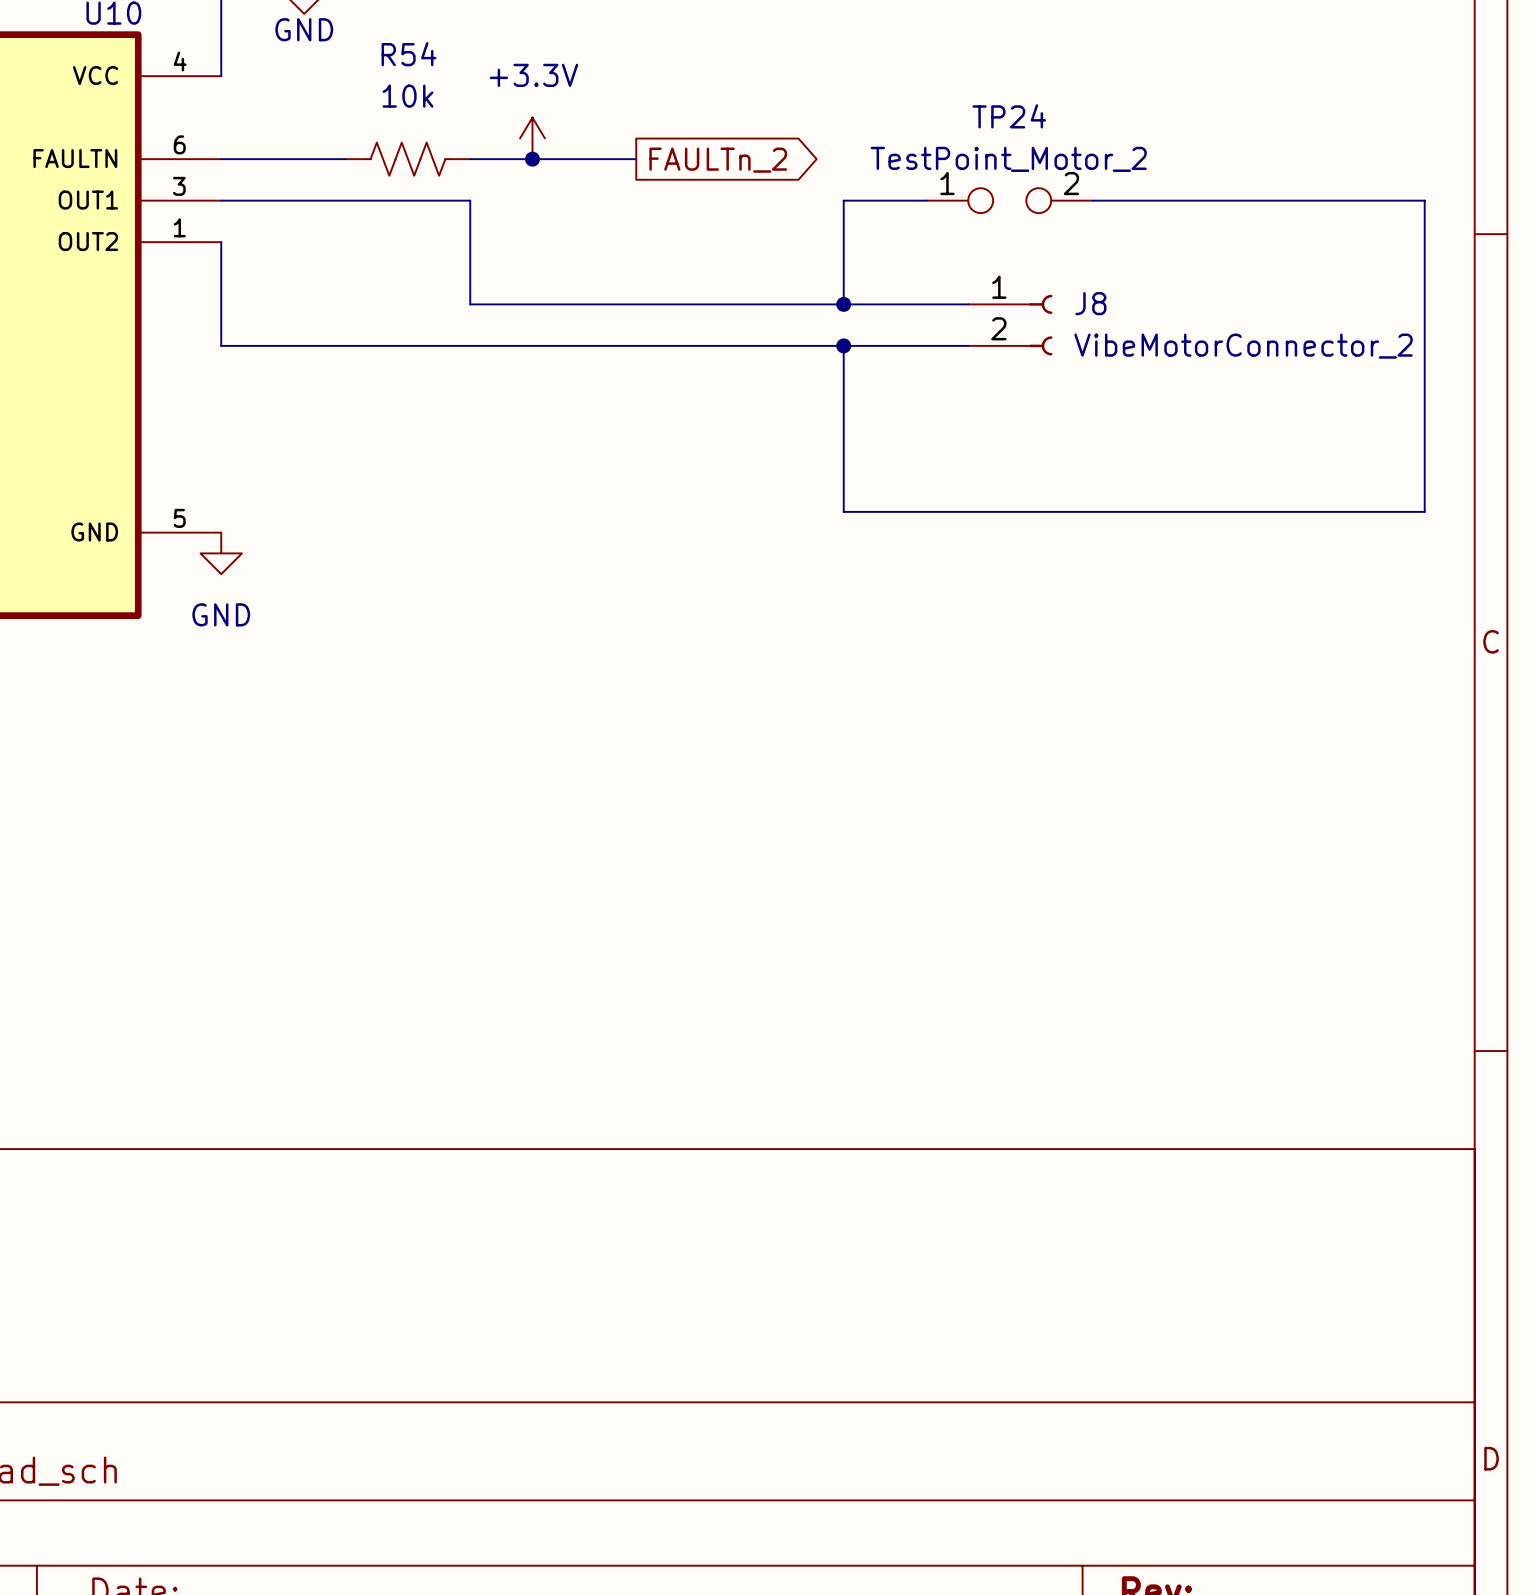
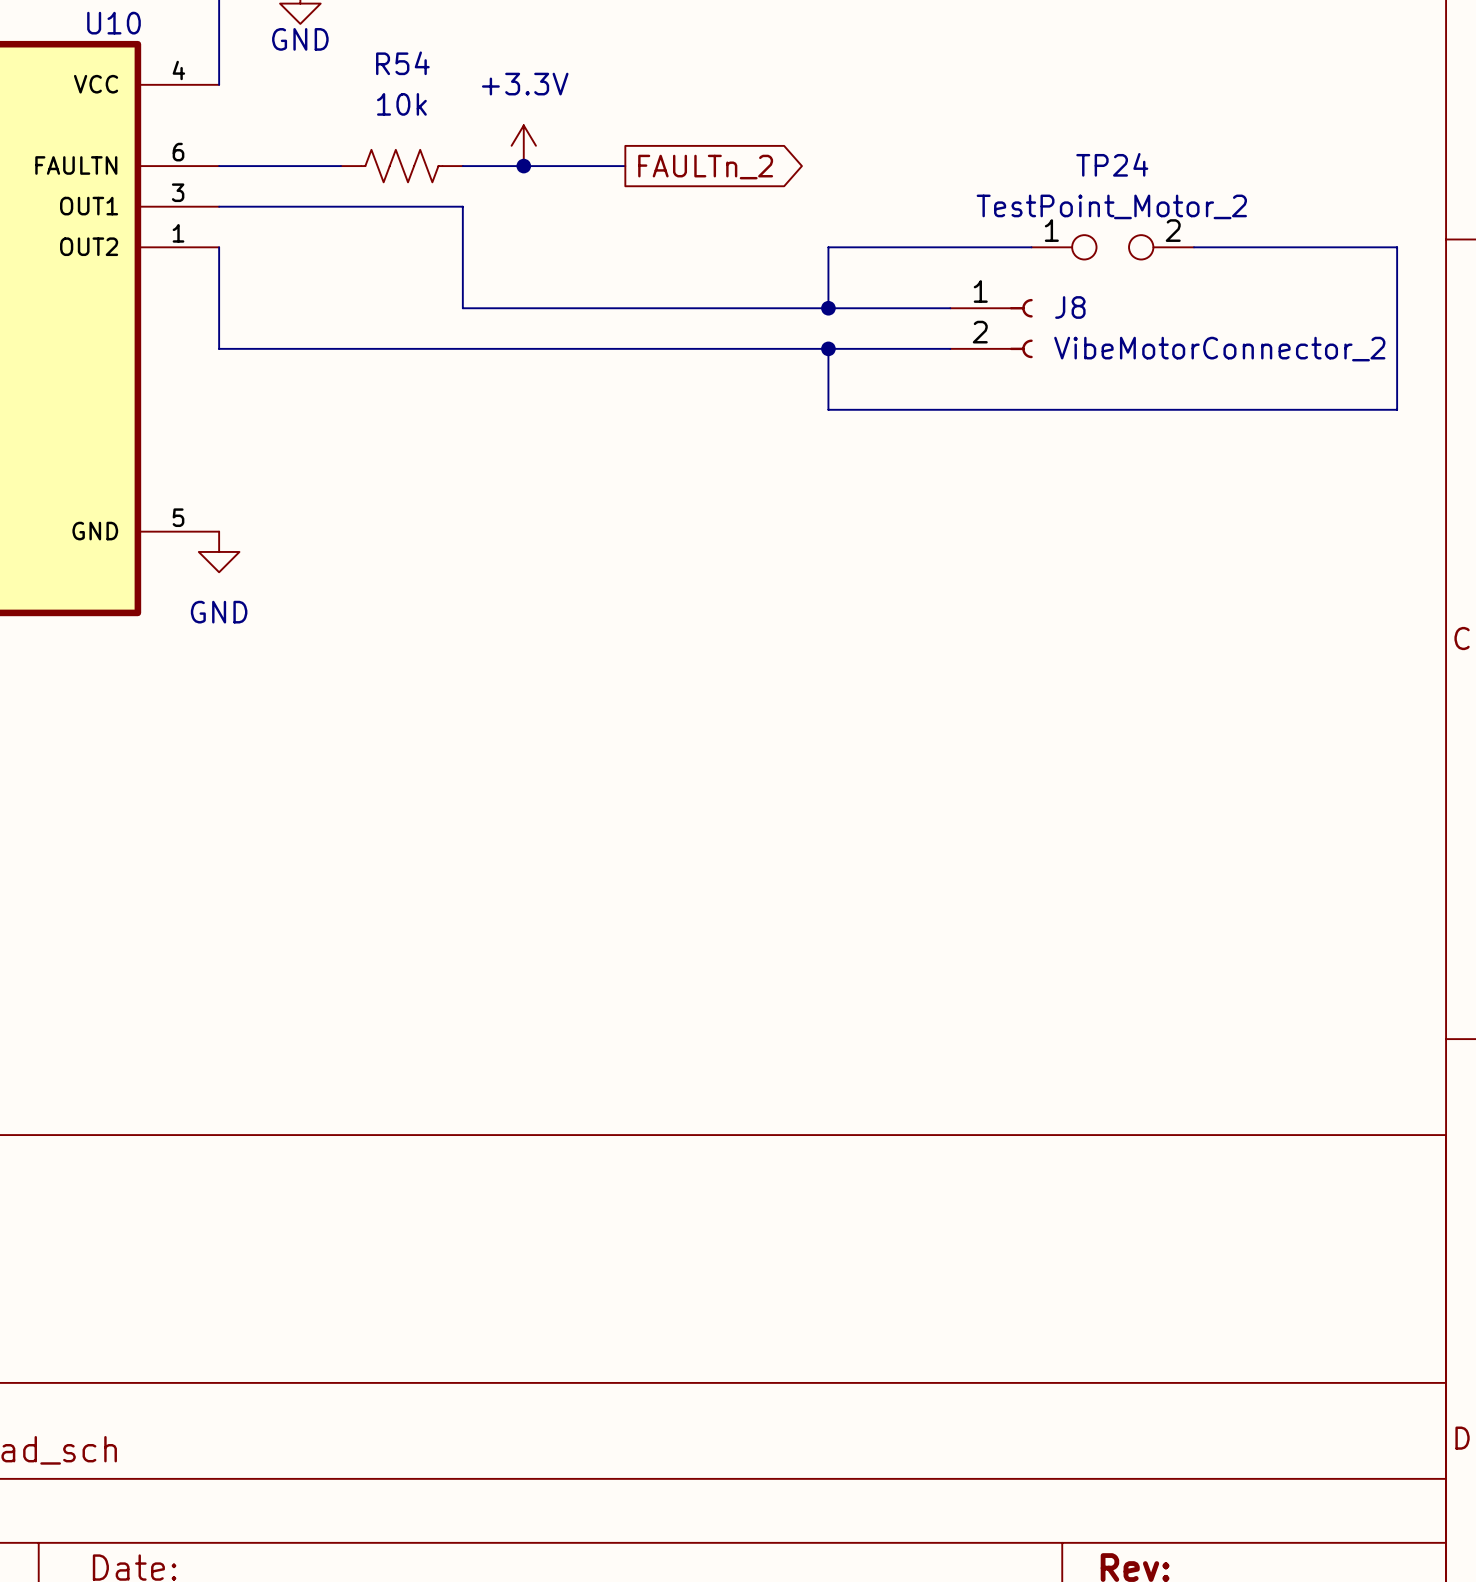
wire: (926, 200) (843, 200) (843, 242) -> (1031, 247) (828, 247)
TP24 position: (1009, 200) -> (1112, 247)
wire: (1092, 200) (1424, 200) (1424, 242) -> (1194, 247) (1397, 247)
wire: (843, 408) (843, 511) (1424, 511) (1424, 408) -> (828, 409) (1397, 409)

